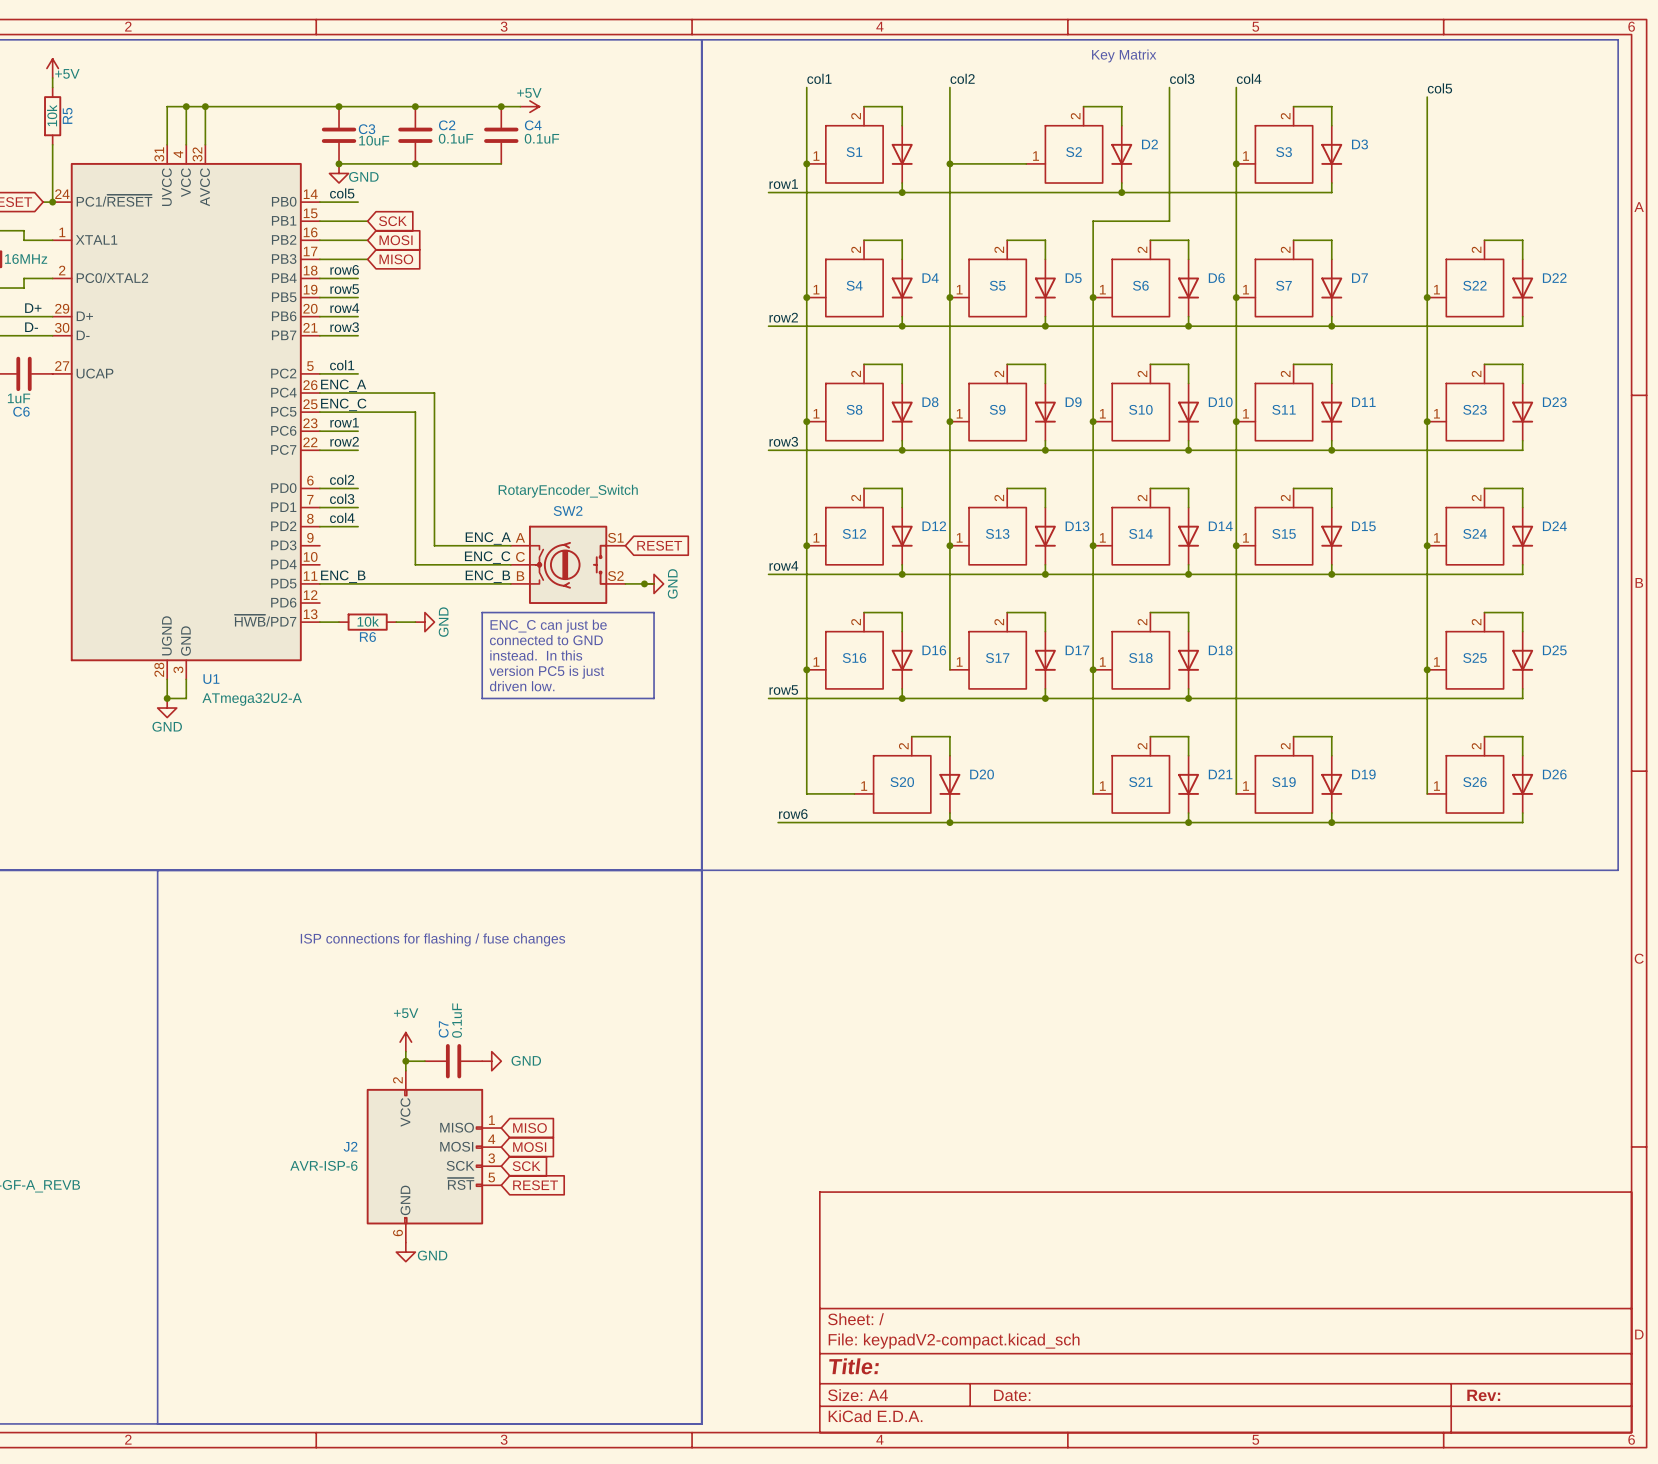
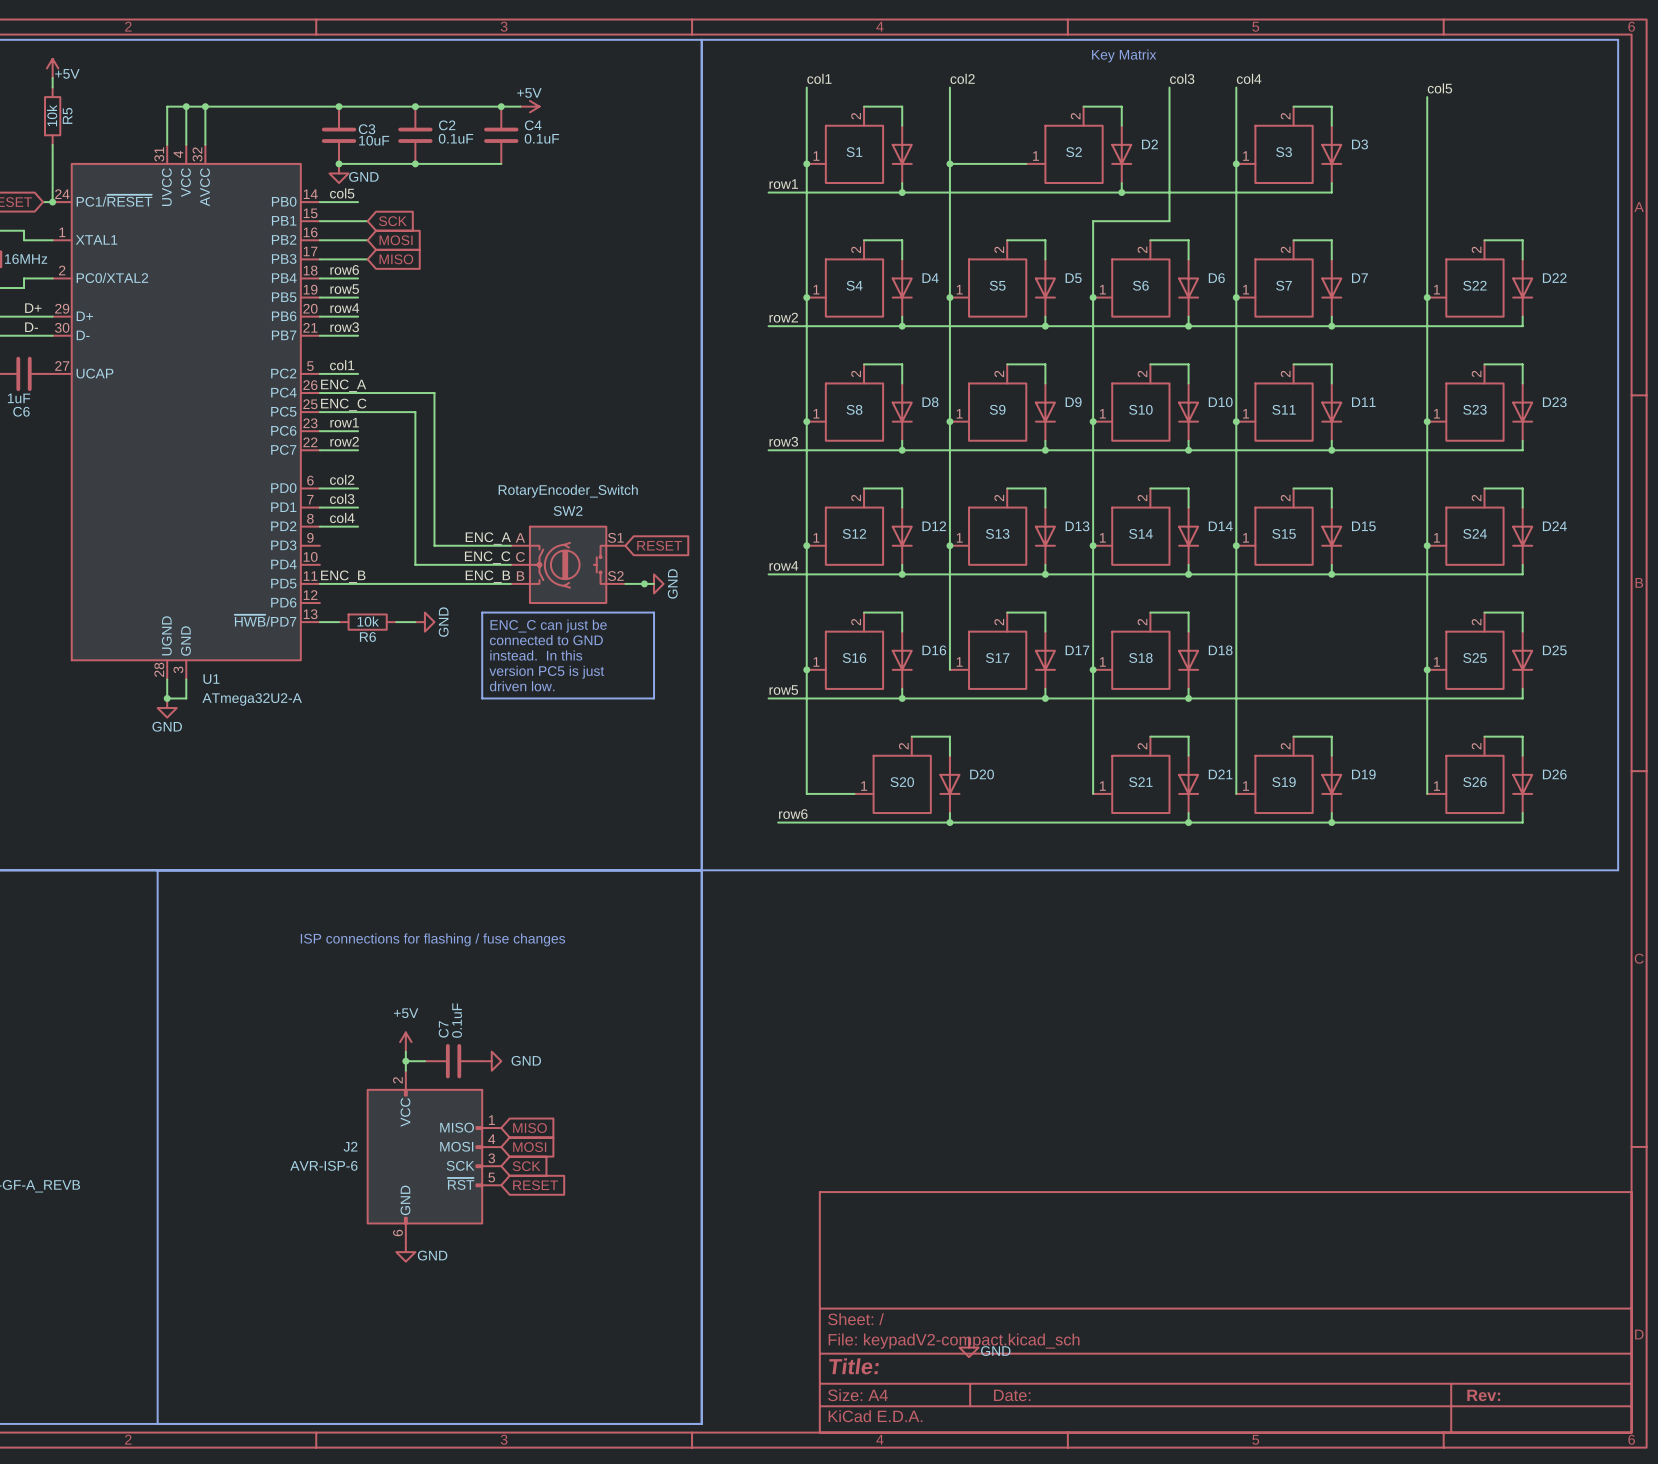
power symbol: none -> GND (969, 1347)

